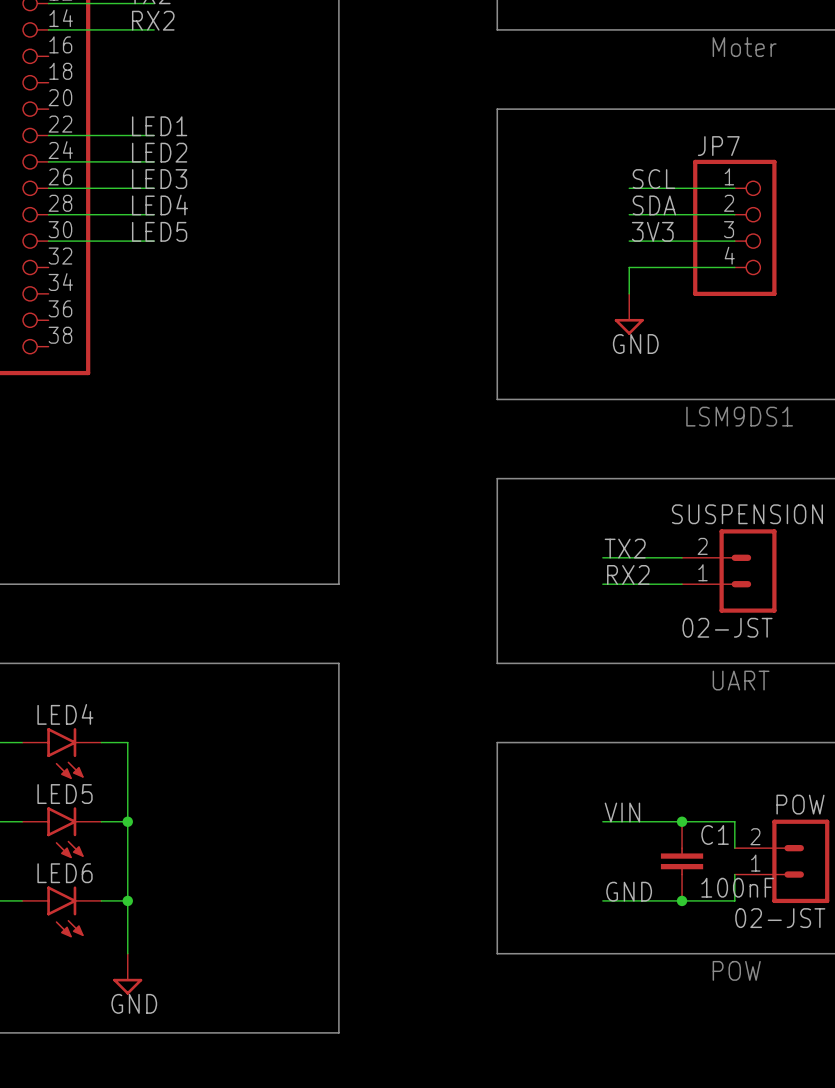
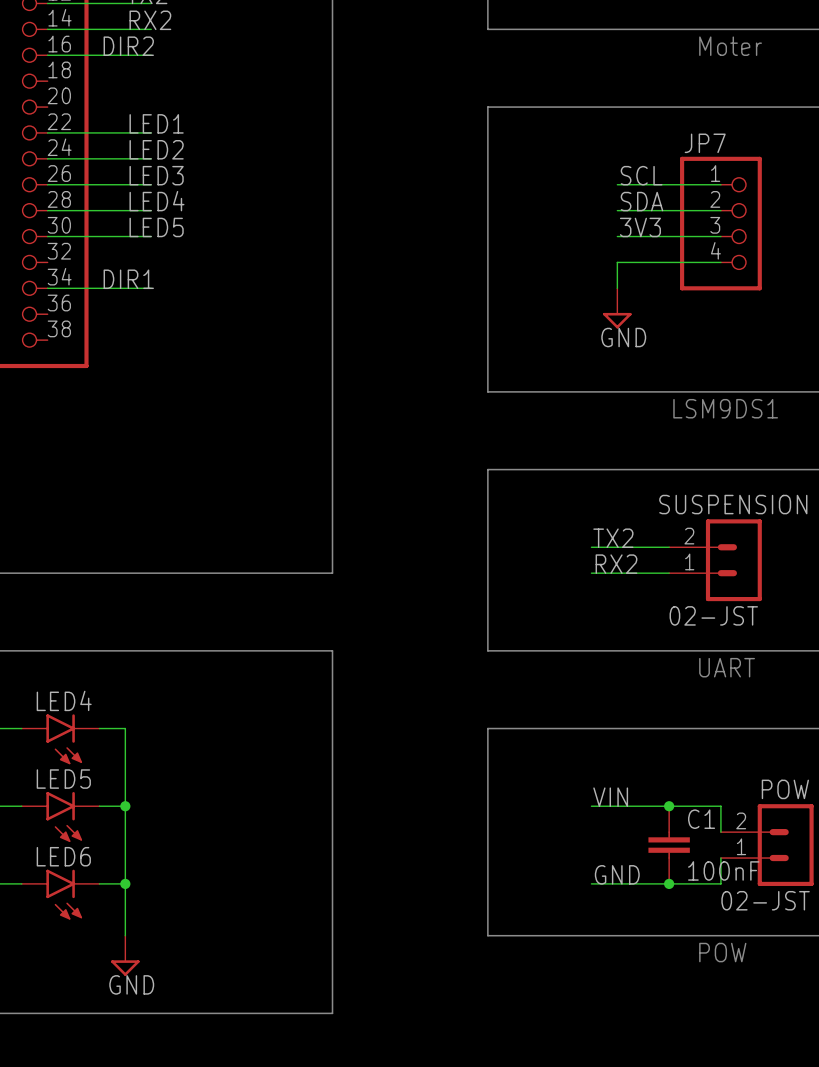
label: none -> DIR2 (128, 46)
wire: none -> (47, 55) (151, 55)
label: none -> DIR1 (128, 279)
wire: none -> (47, 288) (151, 288)

